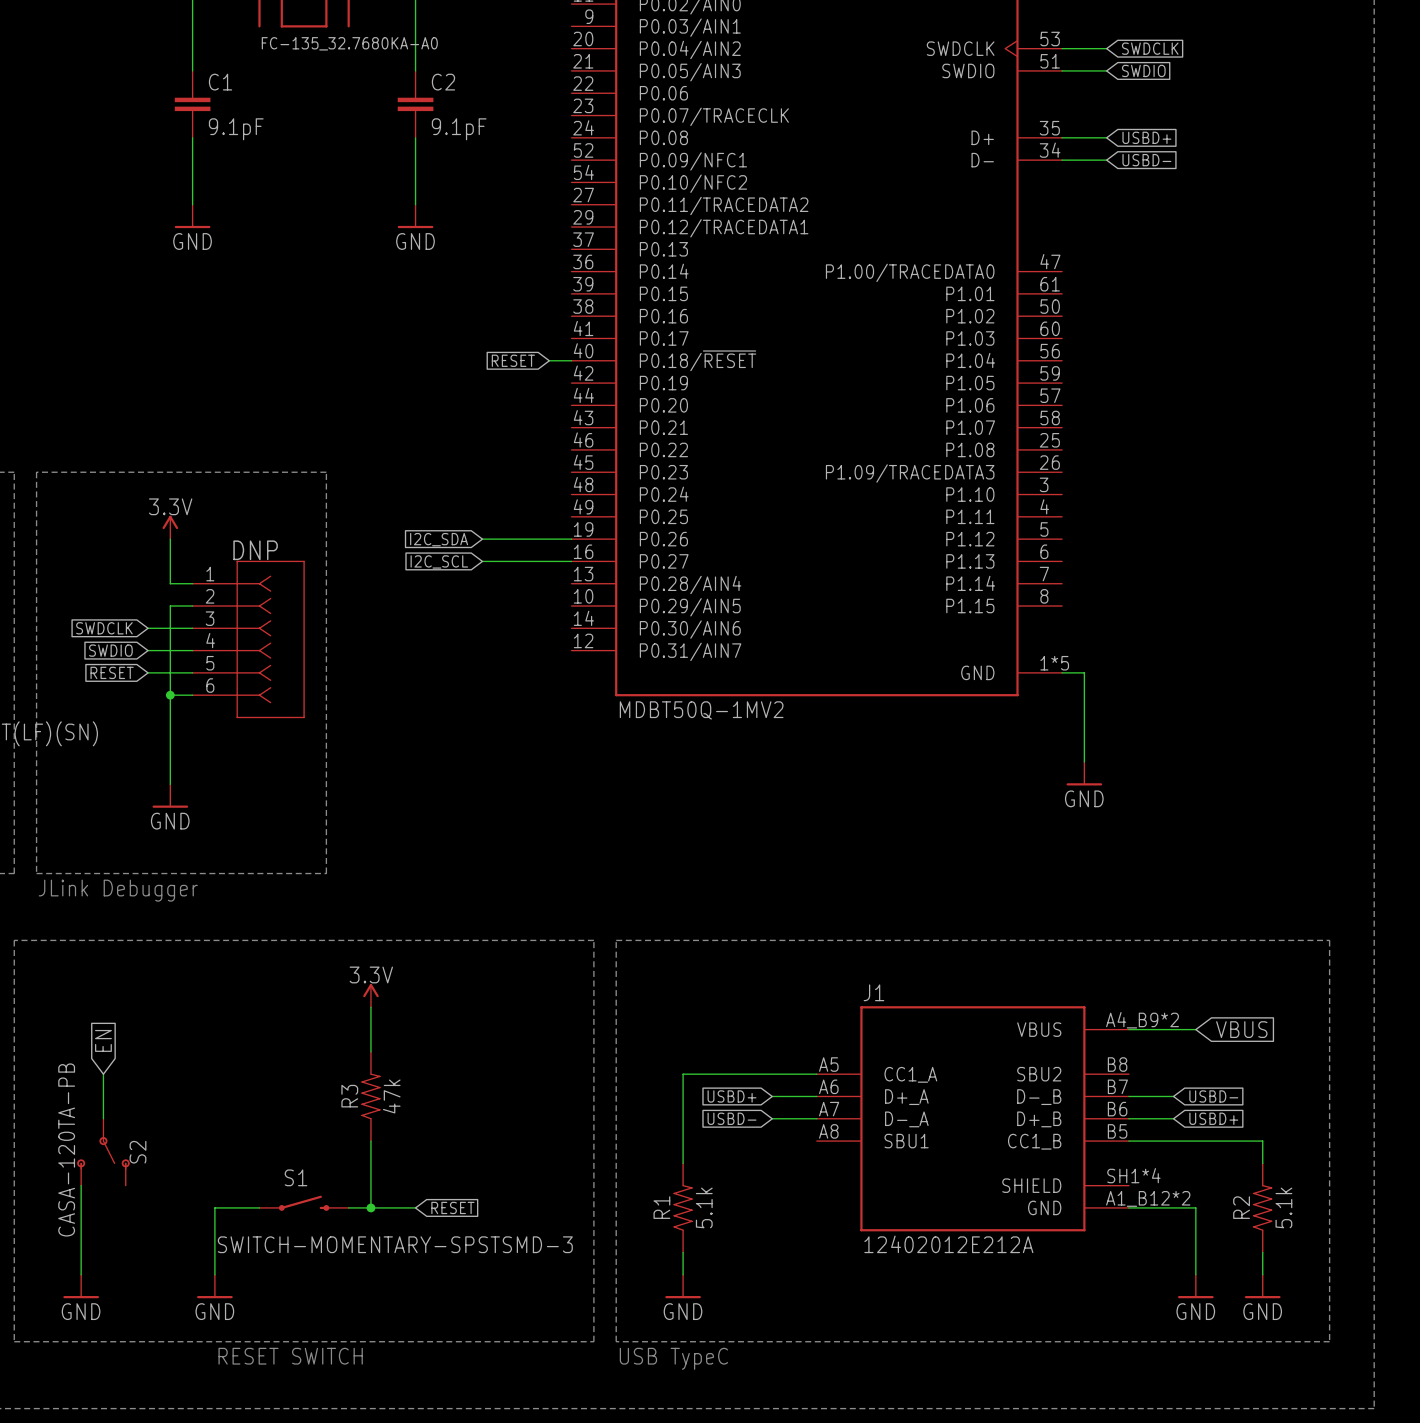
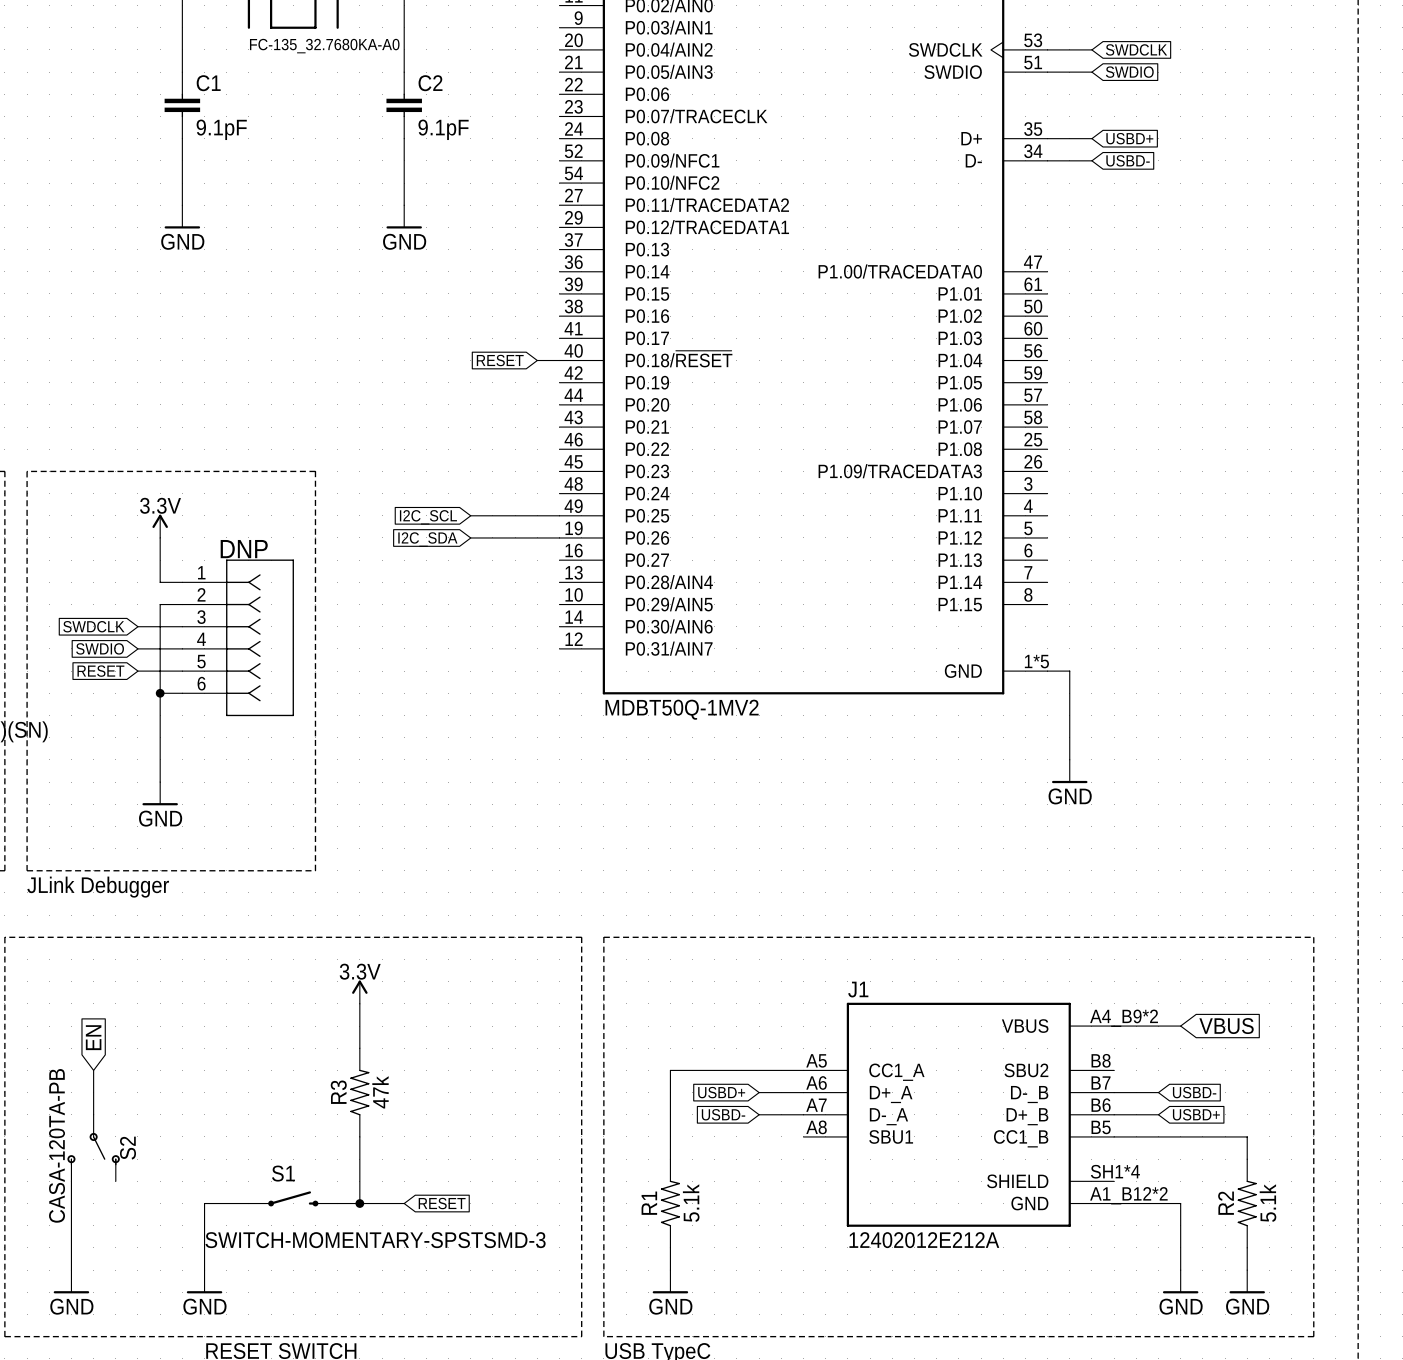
global label position: I2C_SCL (439, 561) -> I2C_SCL (428, 517)
wire: (482, 561) (571, 561) -> (470, 515) (559, 515)

